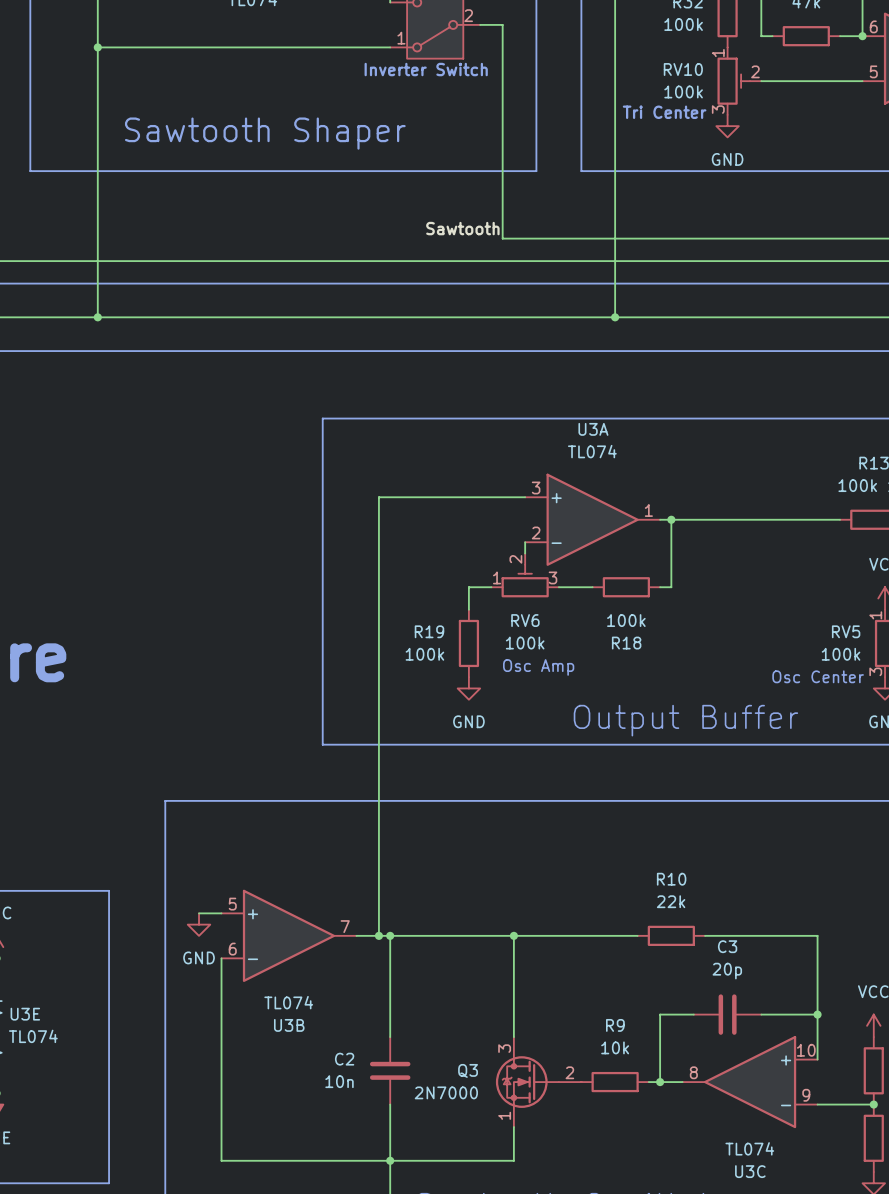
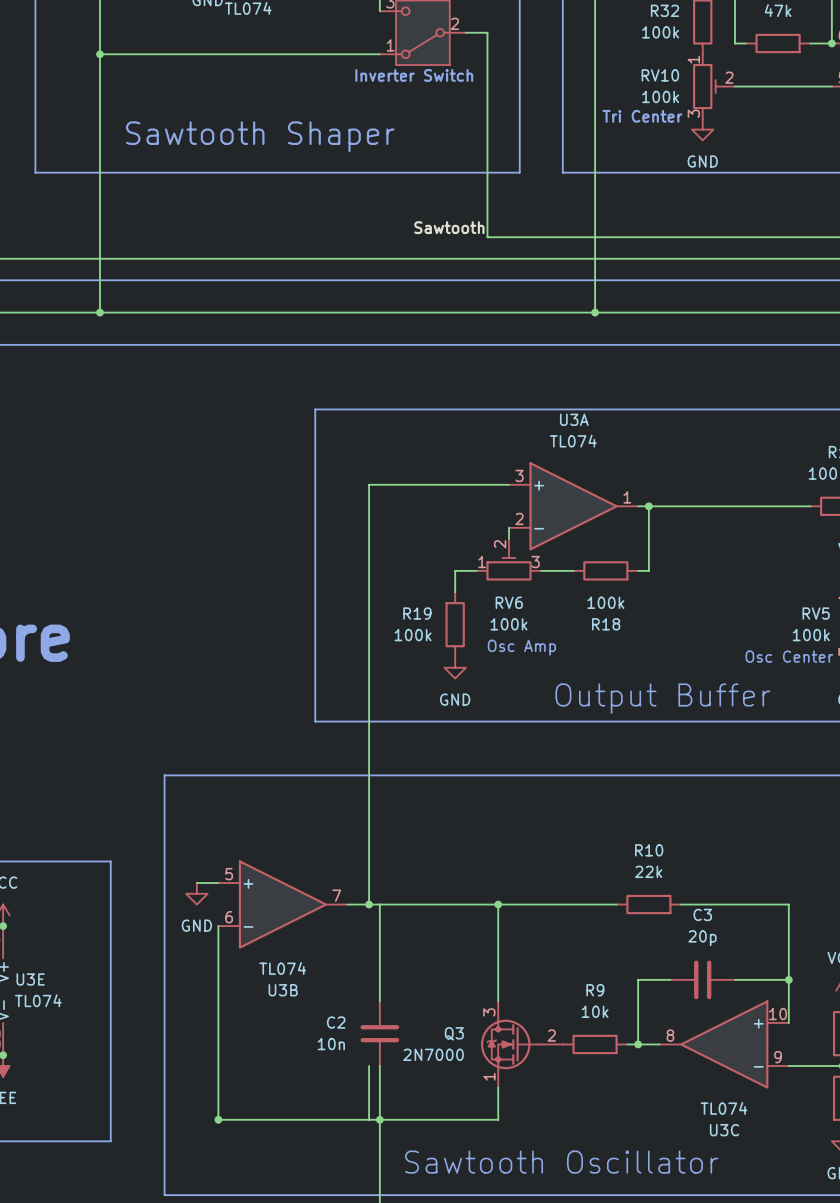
junction: (390, 935) -> none
wire: none -> (369, 1065) (369, 1119)
junction: none -> (218, 1119)

